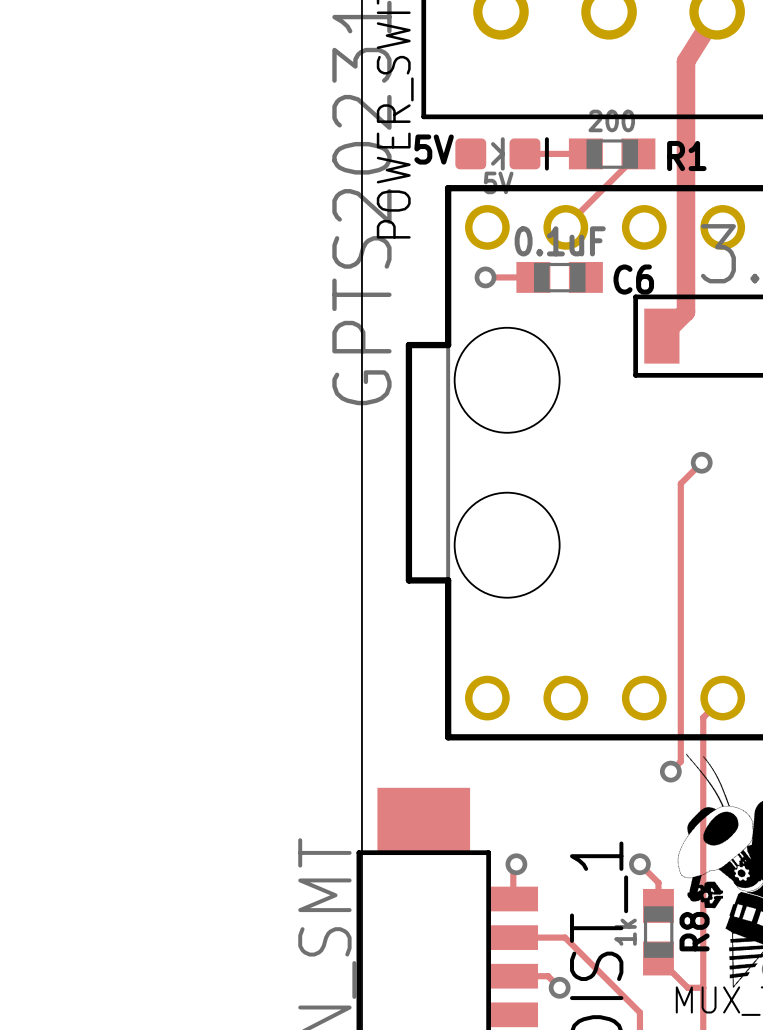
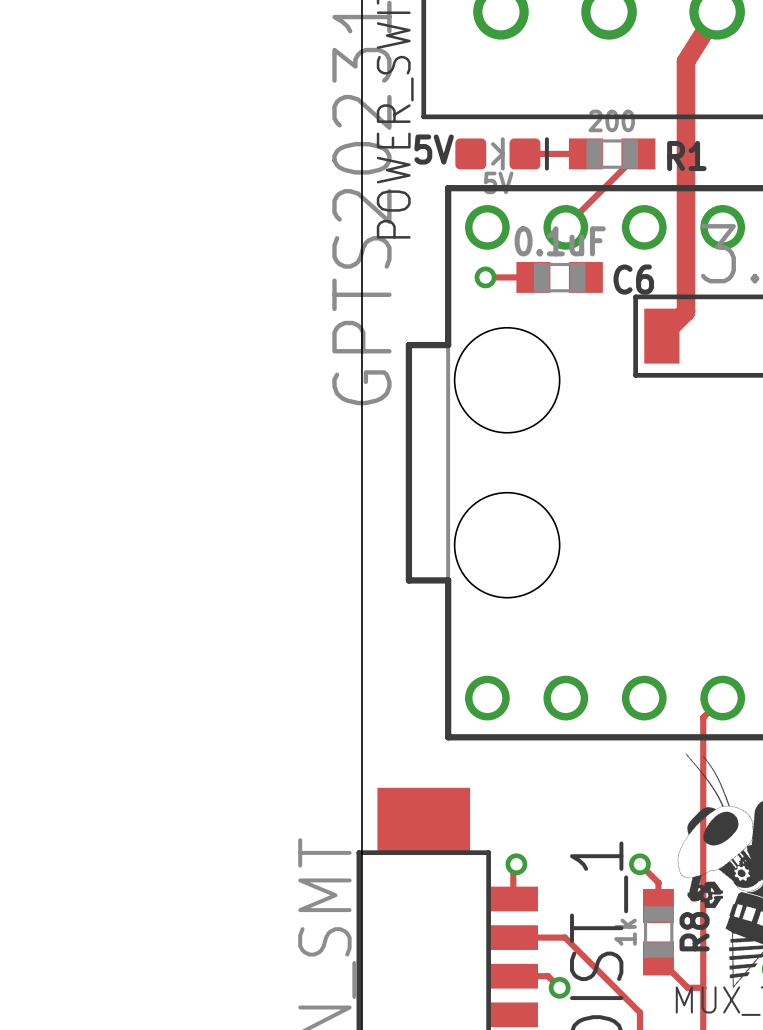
track: (701, 462) (680, 483) (680, 761) (670, 771) -> none
via: (701, 462) -> none
via: (670, 771) -> none

